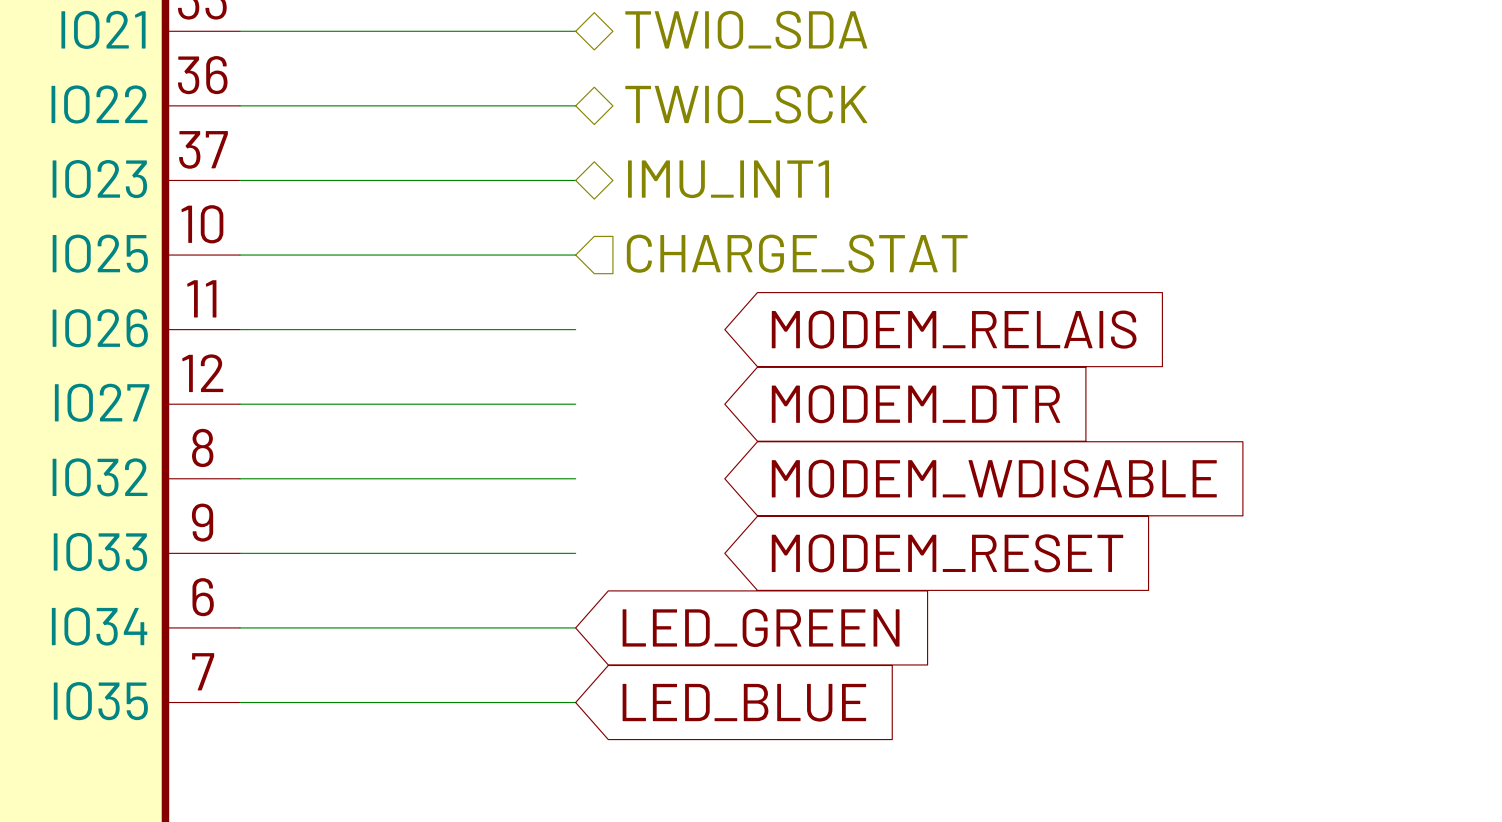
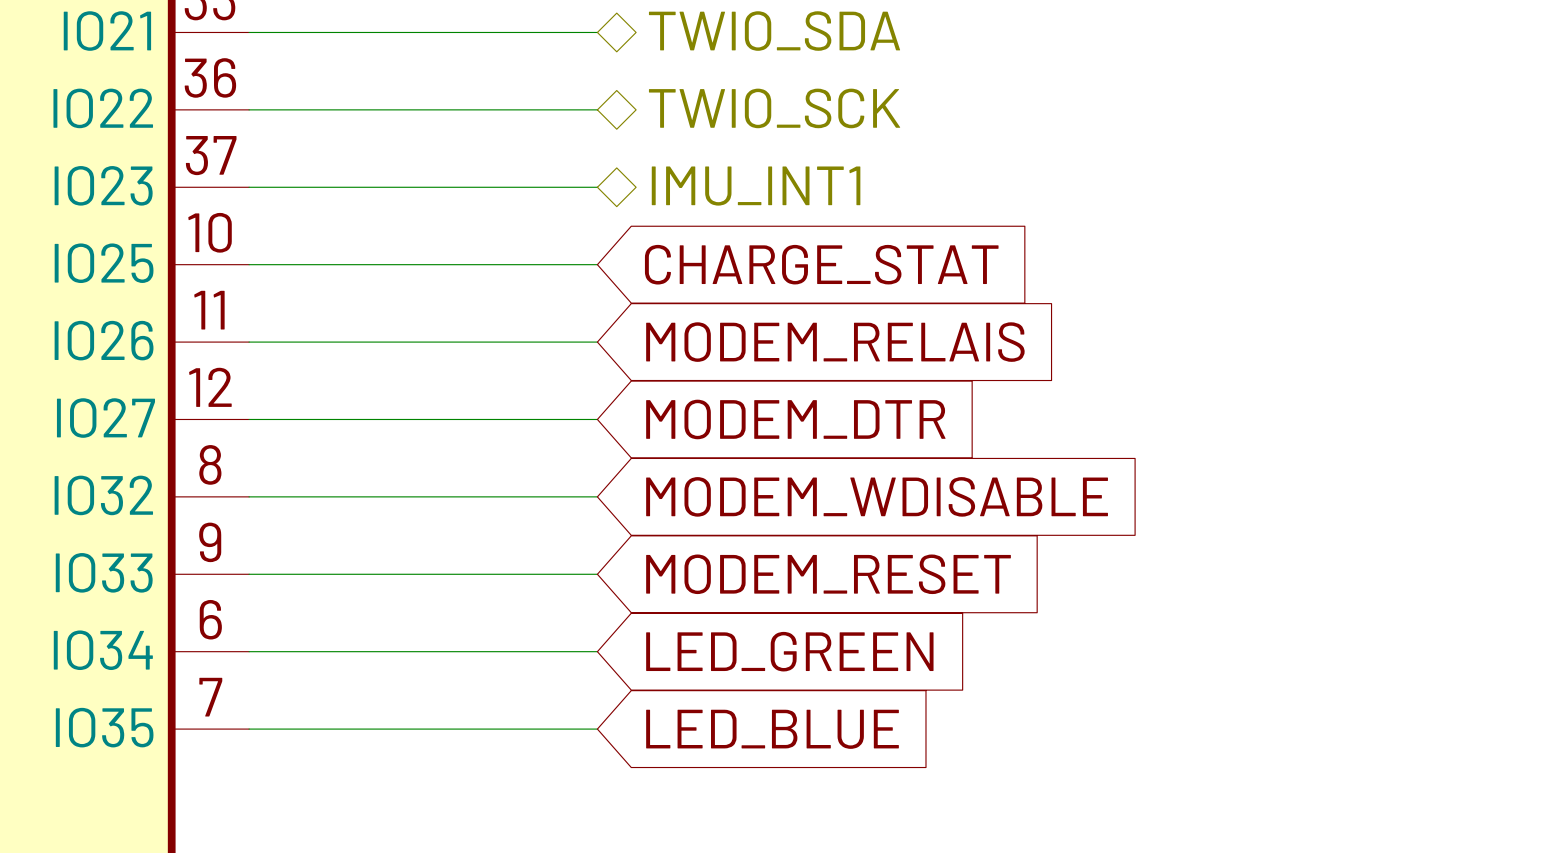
hierarchical label: CHARGE_STAT (797, 253) -> none
global label: none -> CHARGE_STAT (821, 264)
global label position: MODEM_RELAIS (954, 329) -> MODEM_RELAIS (835, 342)
global label position: MODEM_DTR (916, 404) -> MODEM_DTR (795, 419)
global label position: MODEM_WDISABLE (994, 478) -> MODEM_WDISABLE (877, 496)
global label position: MODEM_RESET (947, 553) -> MODEM_RESET (828, 574)

